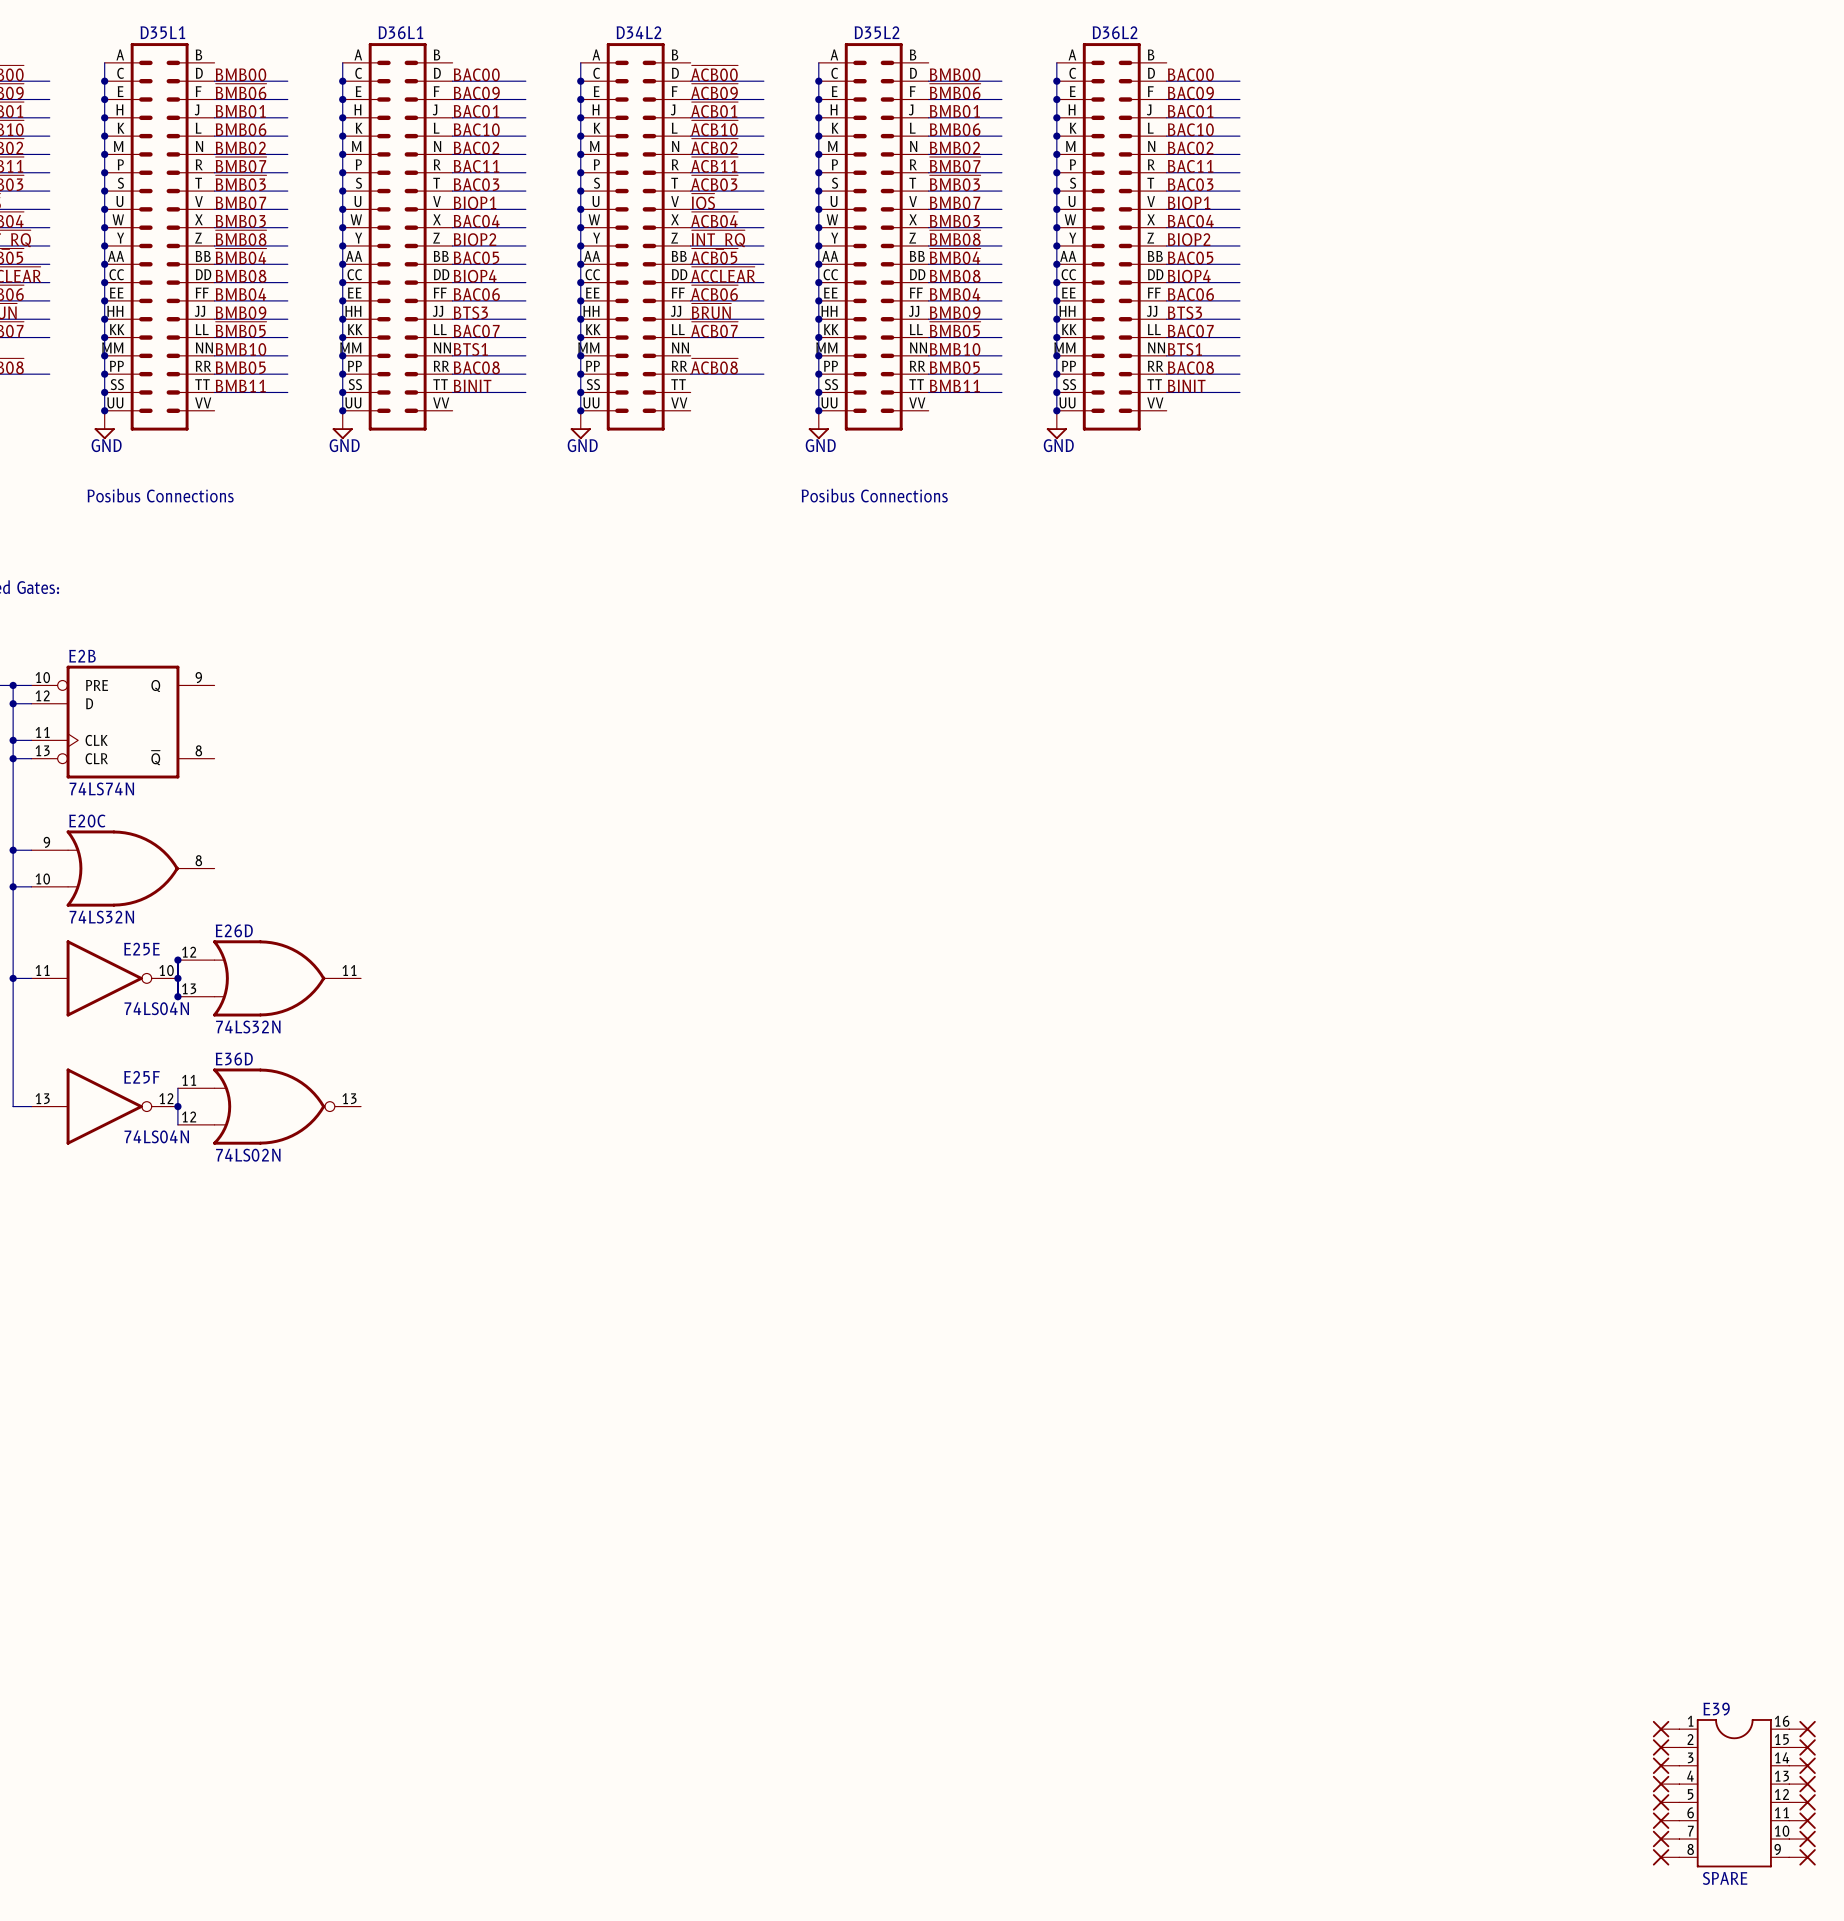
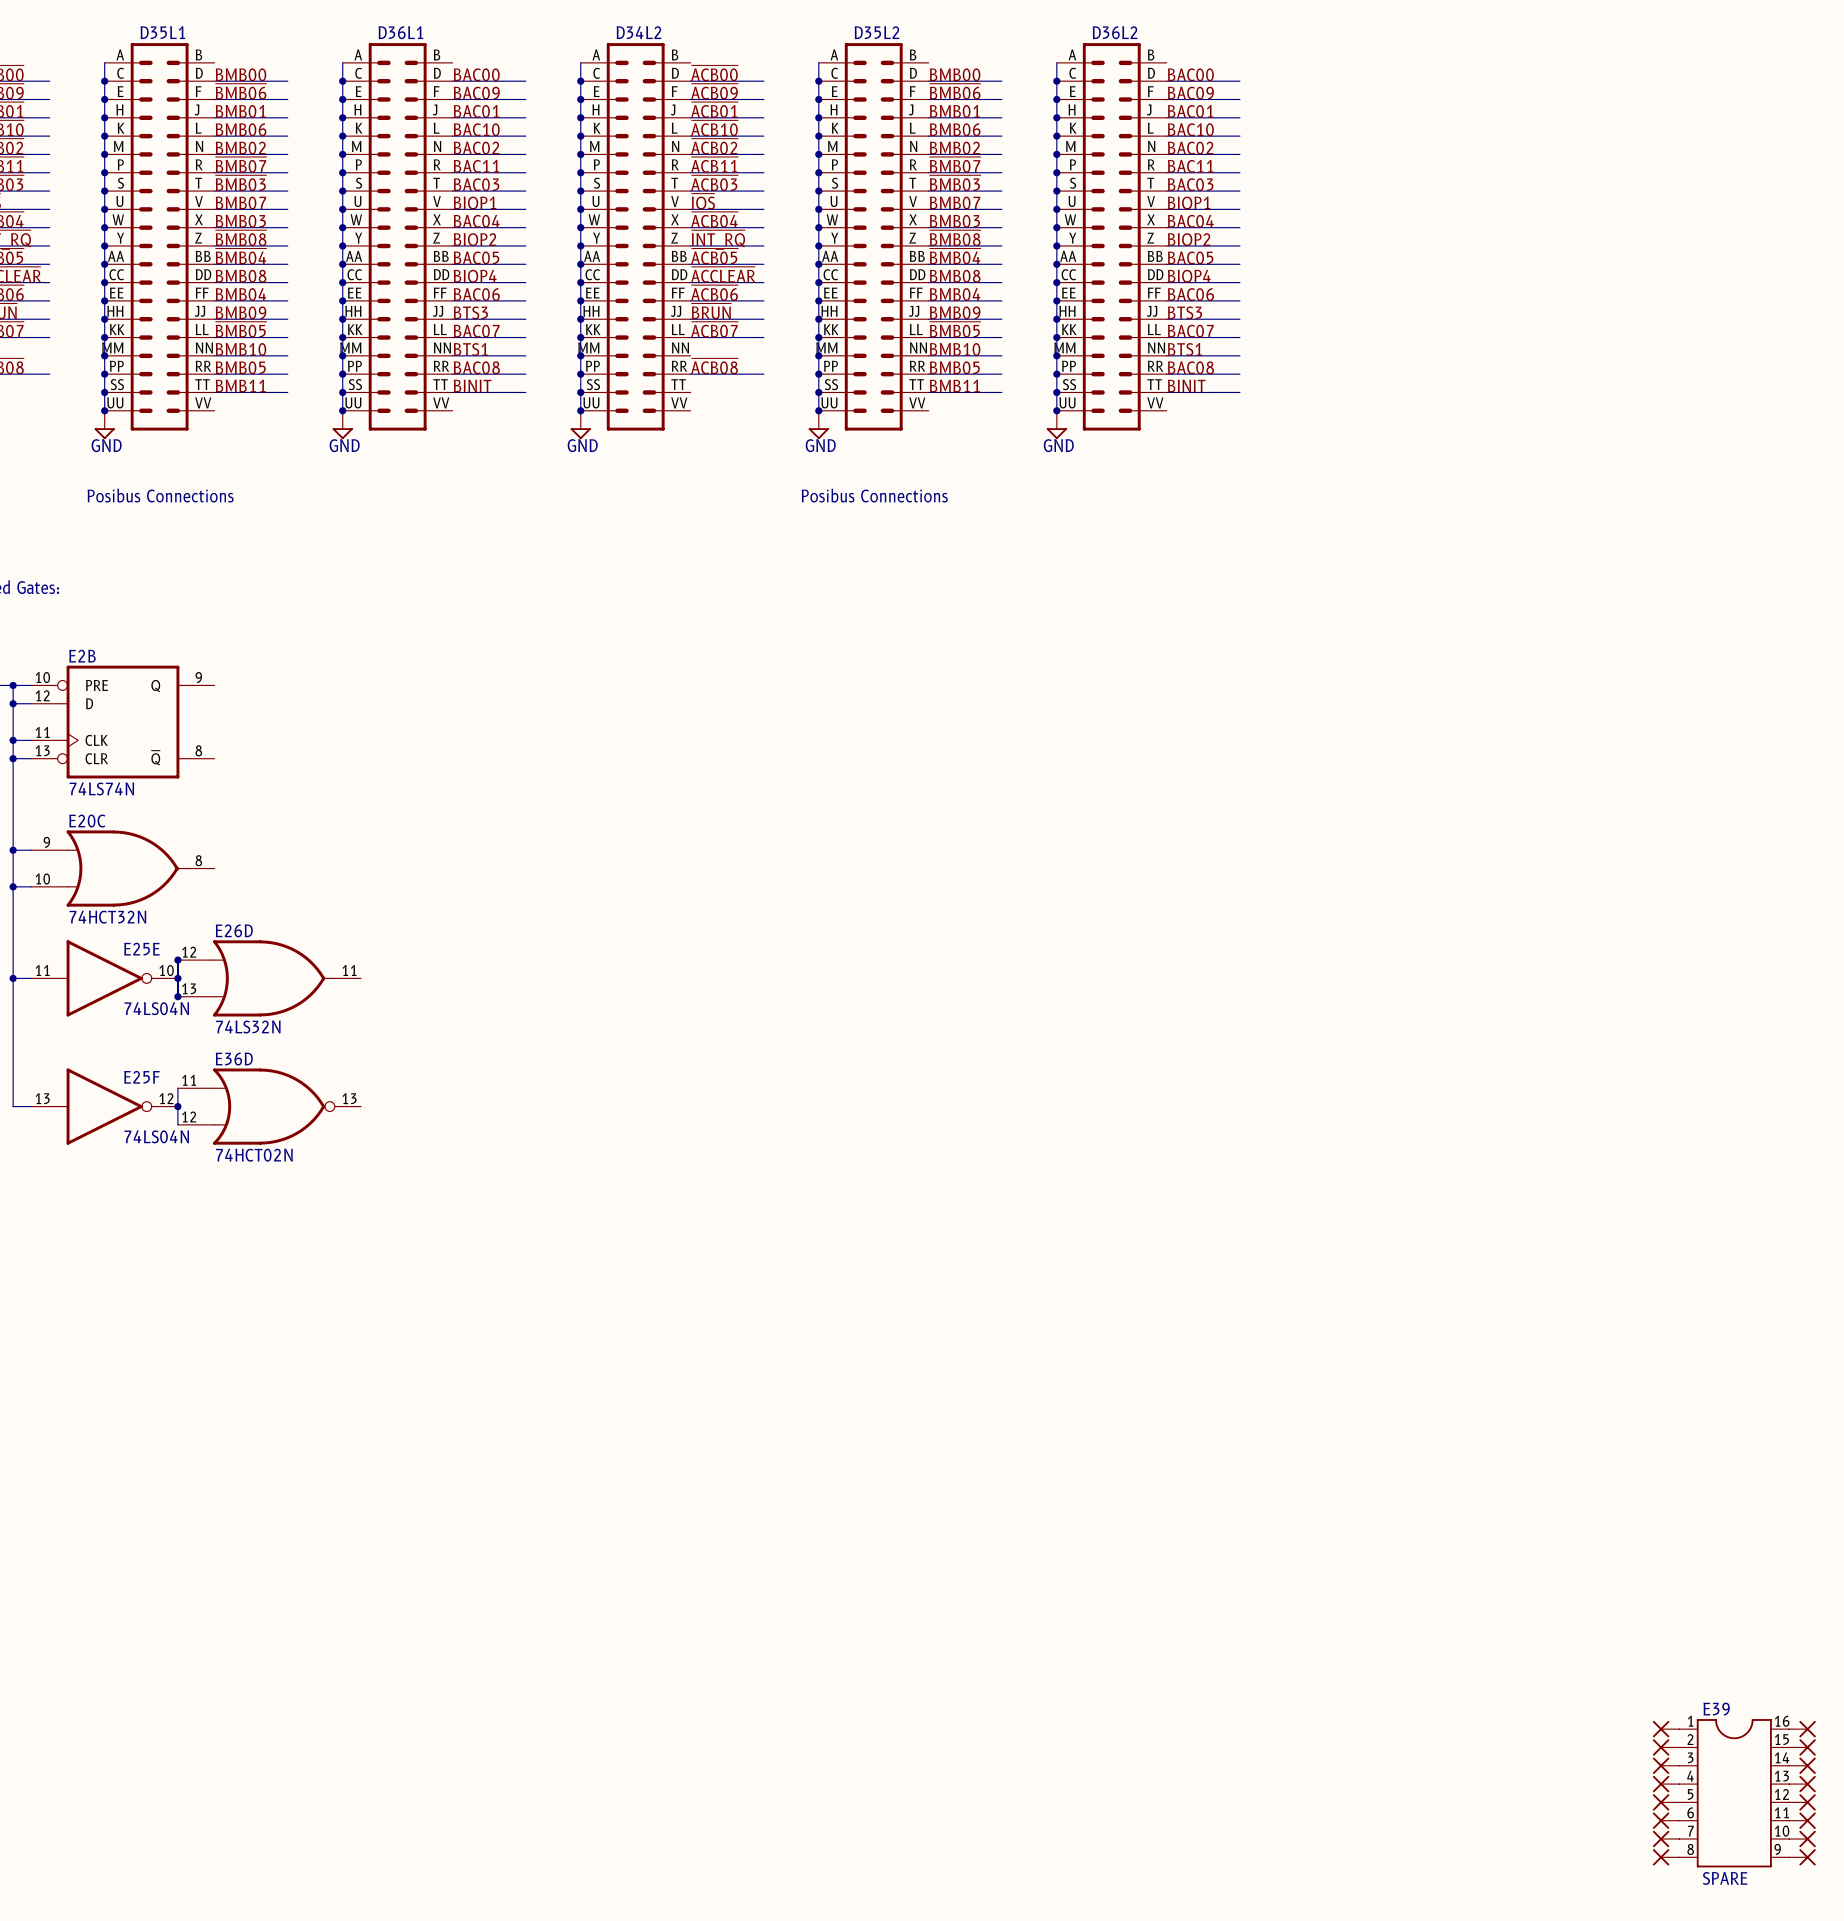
E20C value: 74LS32N (101, 917) -> 74HCT32N (107, 917)
E36D value: 74LS02N (248, 1155) -> 74HCT02N (254, 1155)

